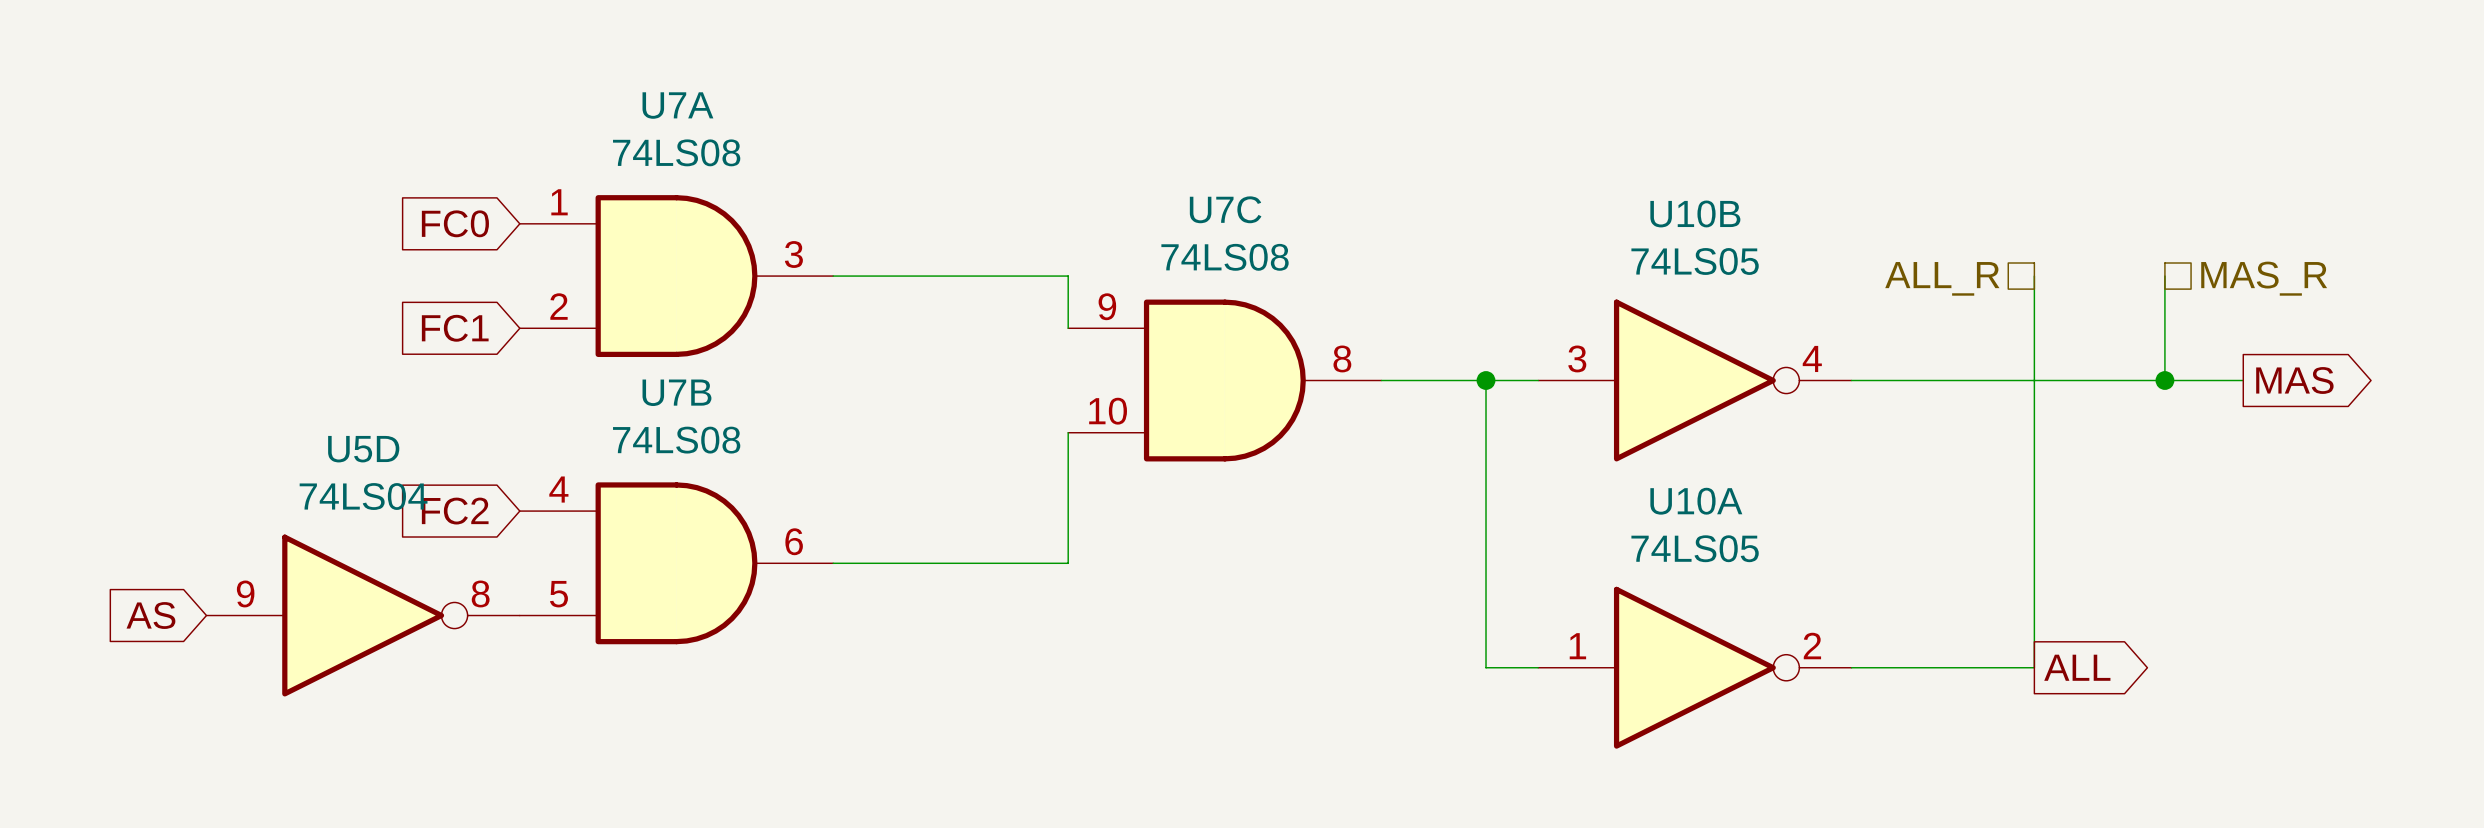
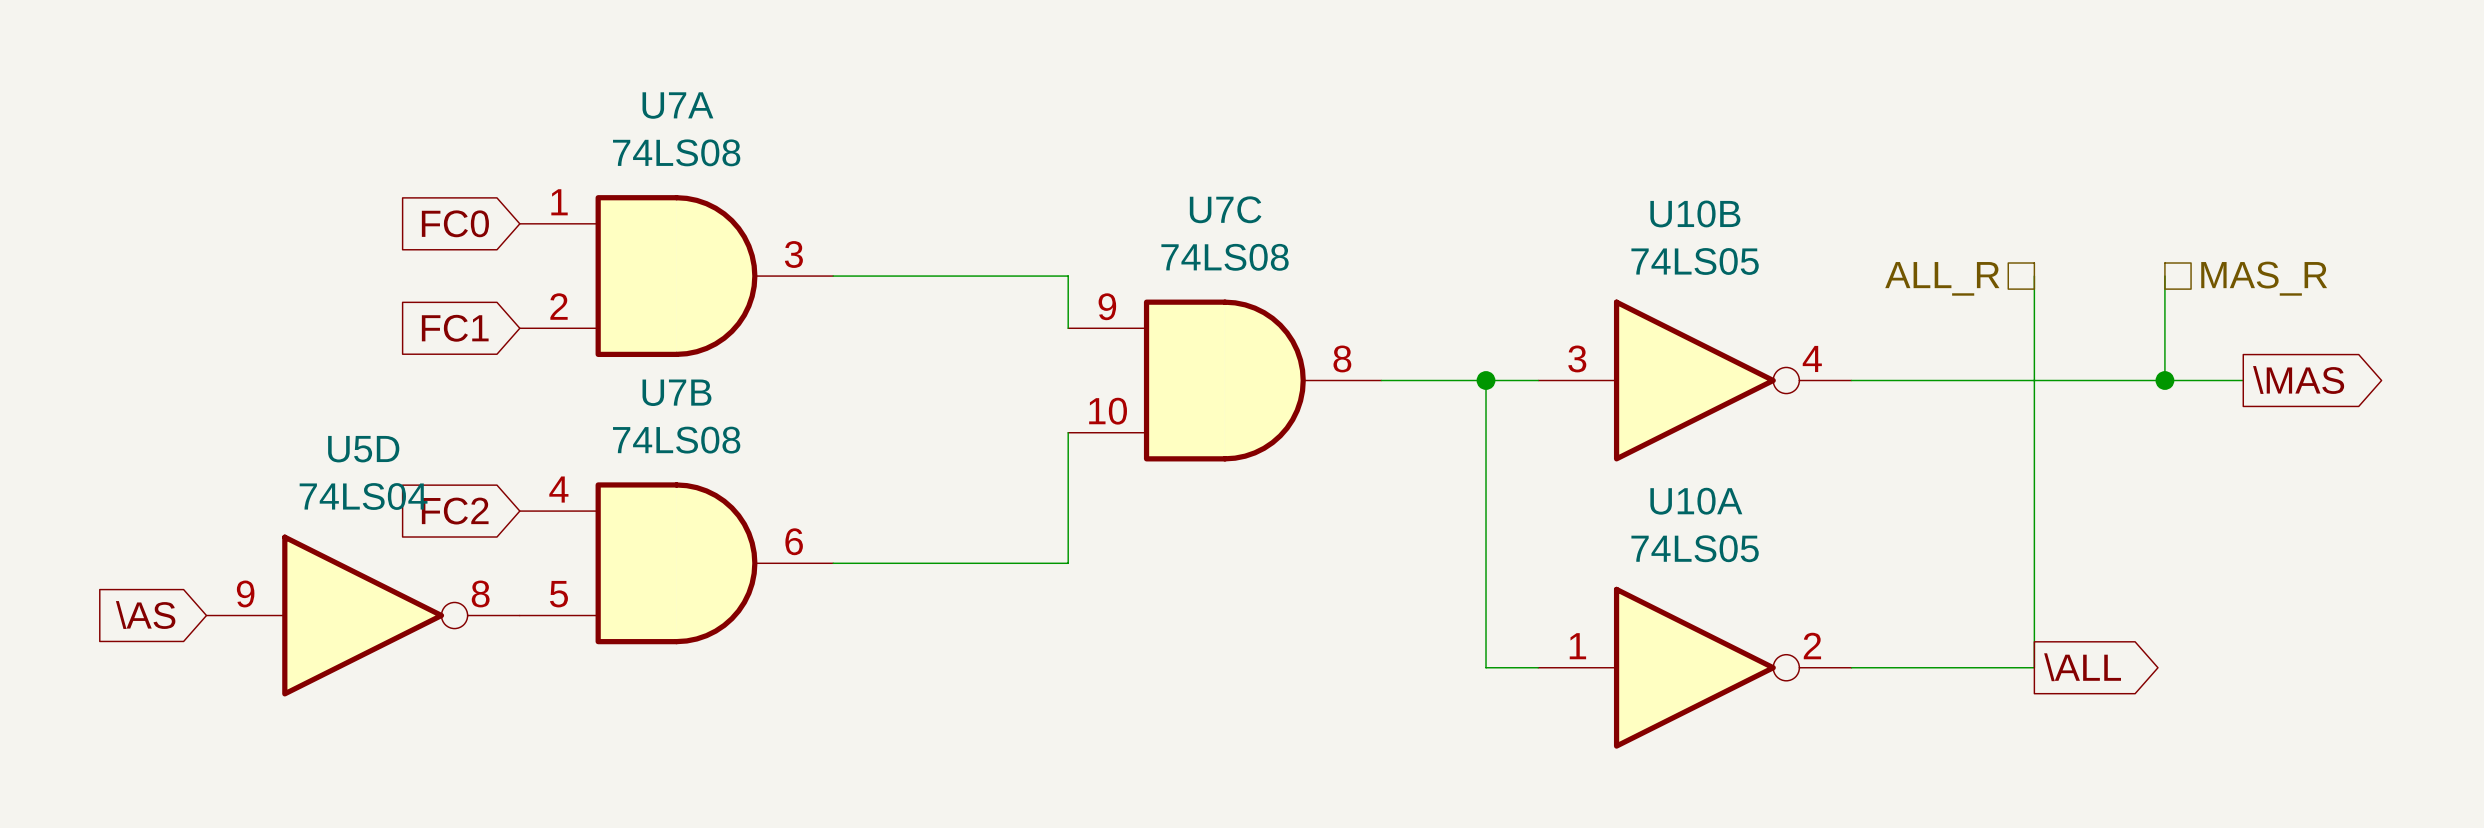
global label: MAS (2294, 380) -> \MAS (2298, 379)
global label: AS (150, 615) -> \AS (145, 615)
global label: ALL (2077, 667) -> \ALL (2082, 667)

